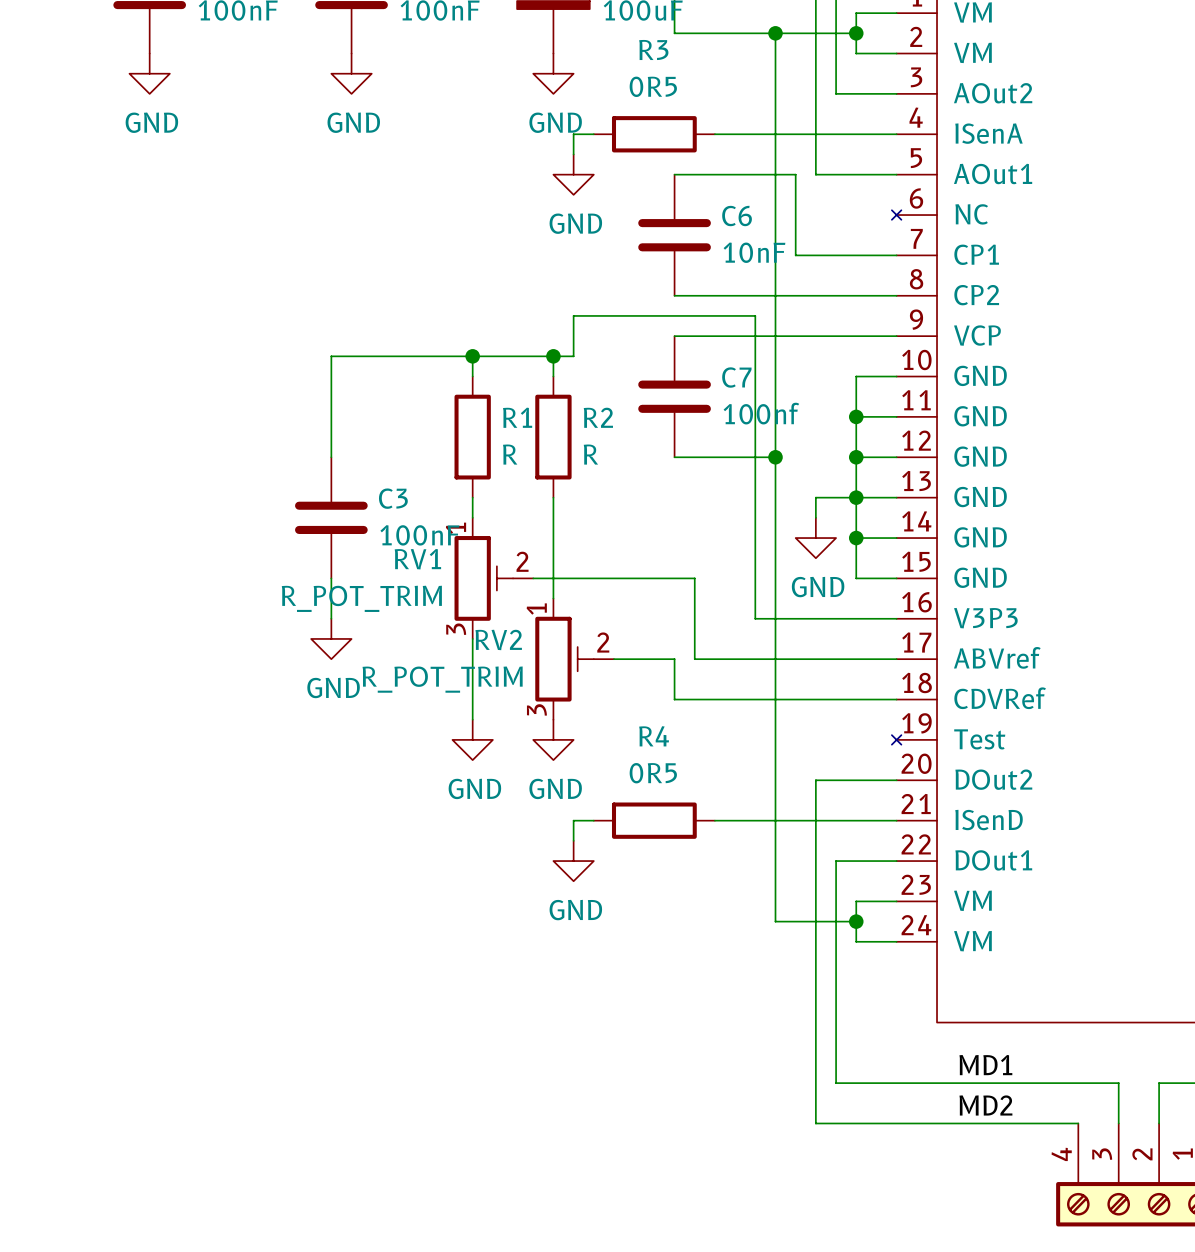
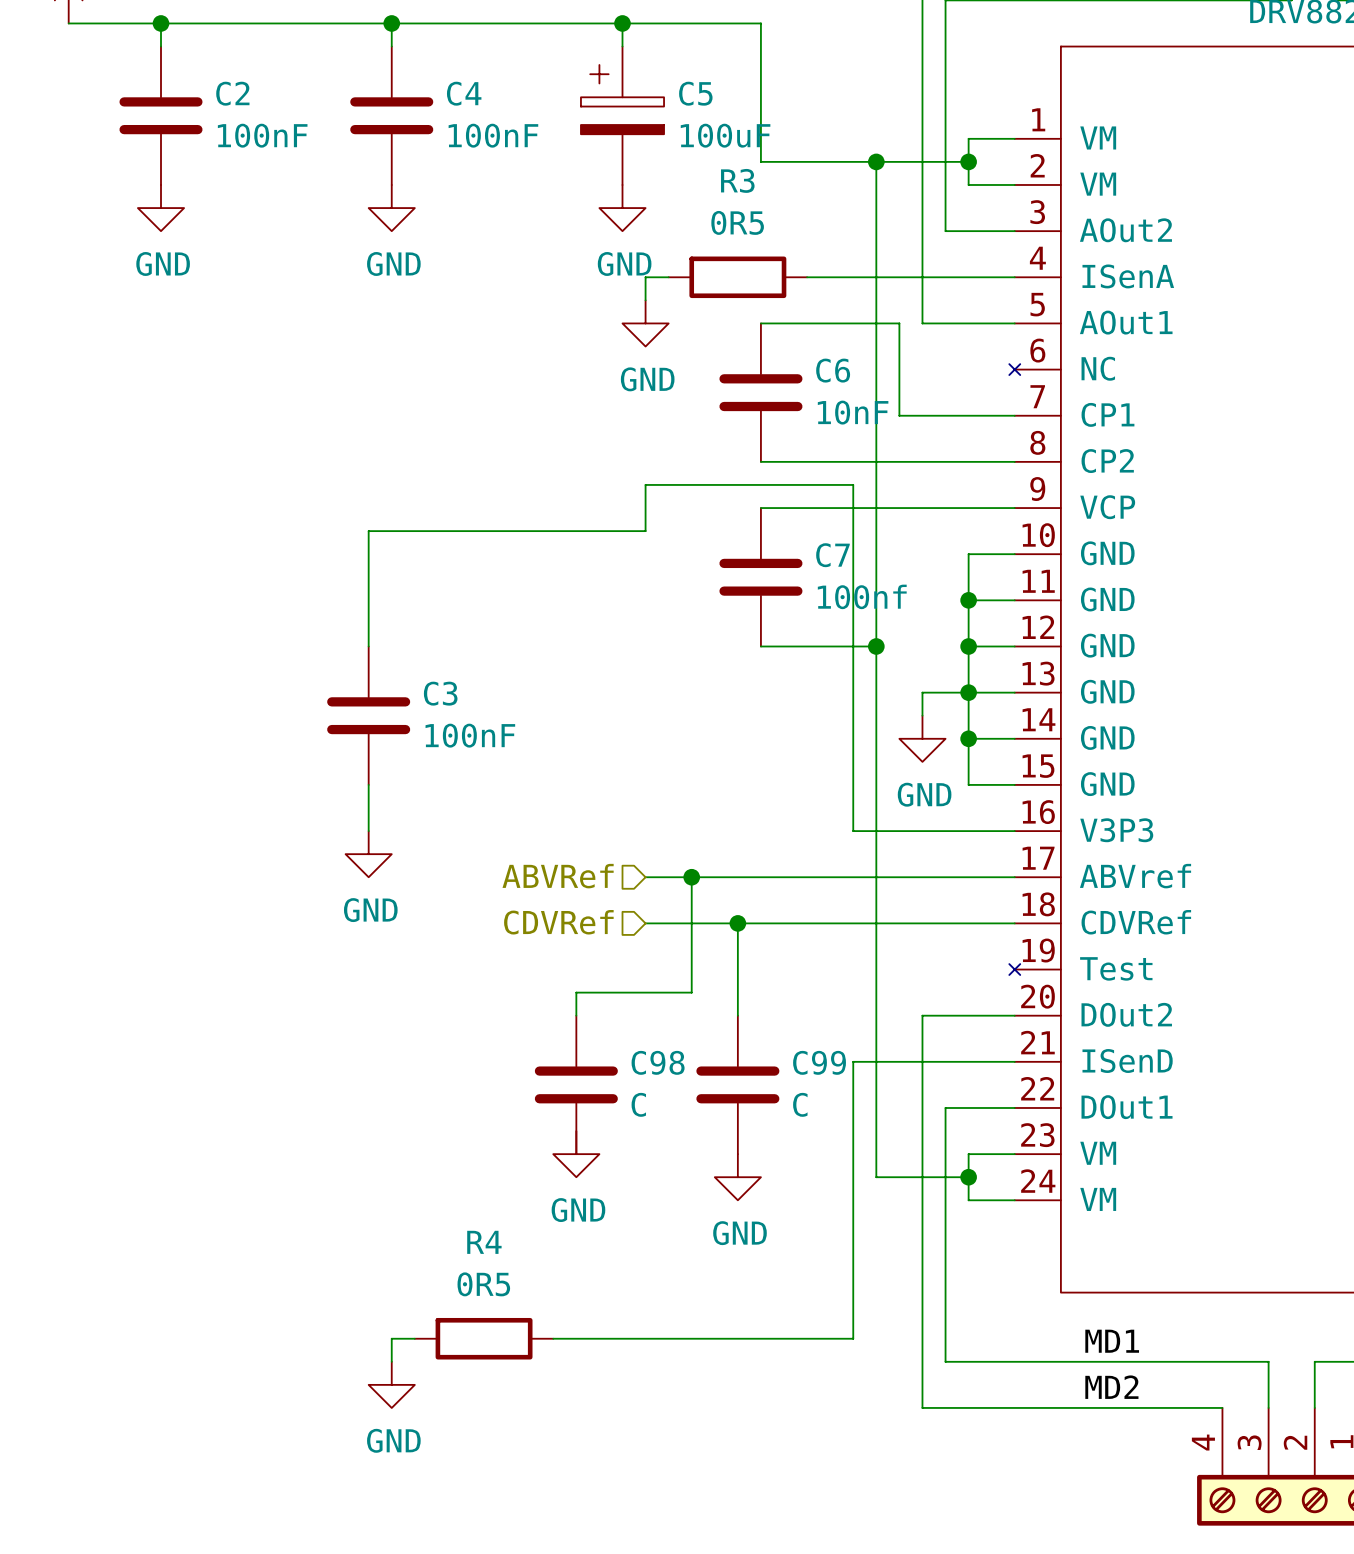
wire: (472, 356) (472, 376) -> none
junction: (472, 356) -> none
wire: (553, 356) (553, 376) -> none
junction: (553, 356) -> none
R1: R (472, 437) -> none
R2: R (553, 437) -> none
wire: (472, 497) (472, 517) -> none
wire: (553, 497) (553, 598) -> none
RV1: R_POT_TRIM (493, 578) -> none
wire: (533, 578) (694, 578) (694, 659) -> none
wire: (472, 638) (472, 719) -> (737, 923) (737, 1015)
hierarchical label: none -> ABVRef (558, 876)
wire: none -> (645, 877) (691, 877) (691, 992) (576, 992) (576, 1015)
RV2: R_POT_TRIM (574, 659) -> none
junction: none -> (691, 877)
wire: (674, 659) (674, 699) -> (760, 877) (784, 877)
hierarchical label: none -> CDVRef (558, 922)
wire: none -> (645, 923) (760, 923)
junction: none -> (737, 923)
power symbol: GND (472, 739) -> none
power symbol: GND (553, 739) -> none
wire: (593, 820) (573, 820) (573, 840) -> (414, 1338) (391, 1338) (391, 1361)
R4 position: (654, 820) -> (484, 1338)
wire: (714, 820) (755, 820) -> (553, 1338) (853, 1338) (853, 1061)
C98: none -> C (576, 1084)
C99: none -> C (737, 1084)
power symbol: GND (573, 861) -> none
power symbol: none -> GND (576, 1154)
power symbol: none -> GND (737, 1177)
power symbol: none -> GND (391, 1384)

